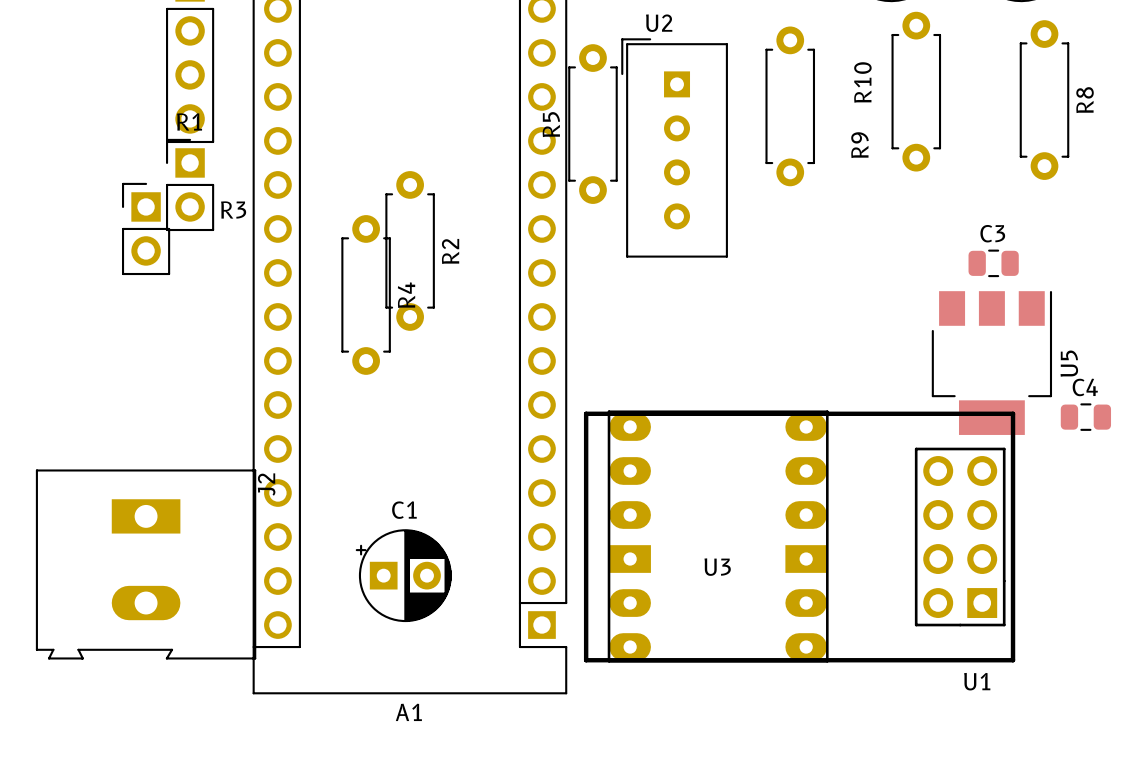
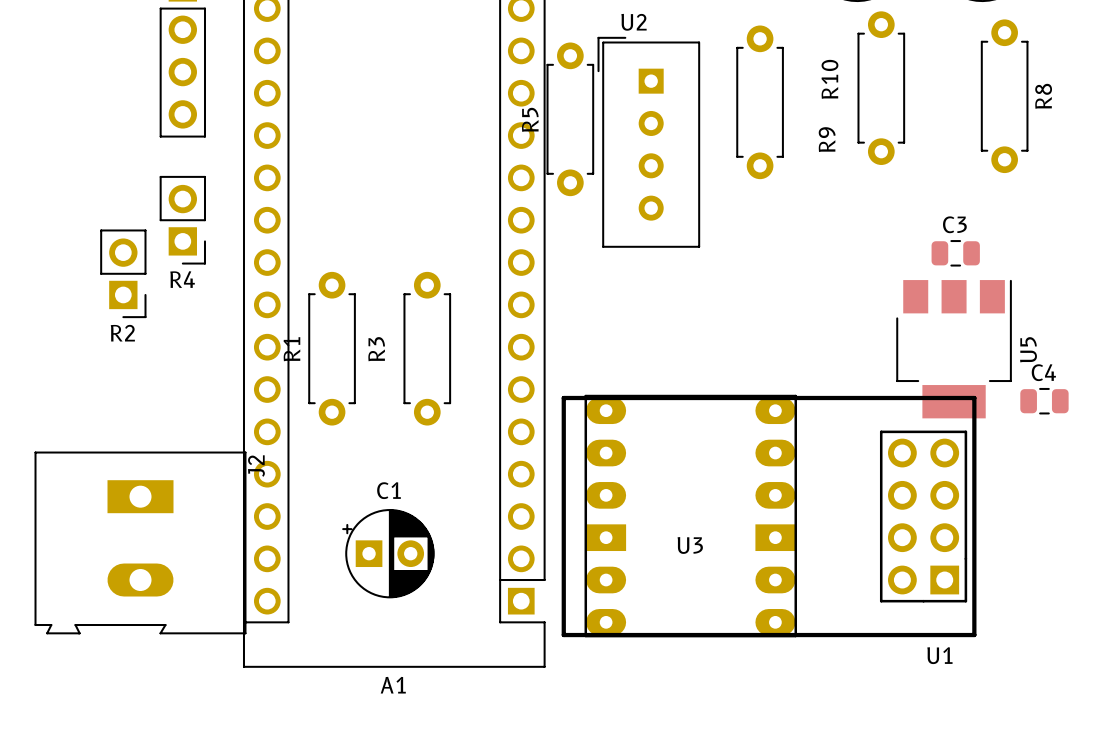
R1 name position: R1 (189, 121) -> R1 (291, 349)
R1 footprint: [165, 138, 215, 232] -> [308, 271, 356, 426]
R2 footprint: [385, 171, 435, 331] -> [100, 229, 147, 319]
R3 footprint: [121, 182, 171, 276] -> [403, 271, 452, 426]
R3 name position: R3 (233, 209) -> R3 (376, 349)
R4 footprint: [341, 215, 391, 375] -> [159, 175, 206, 265]
R2 name position: R2 (450, 251) -> R2 (122, 333)
R4 name position: R4 (406, 295) -> R4 (182, 279)

